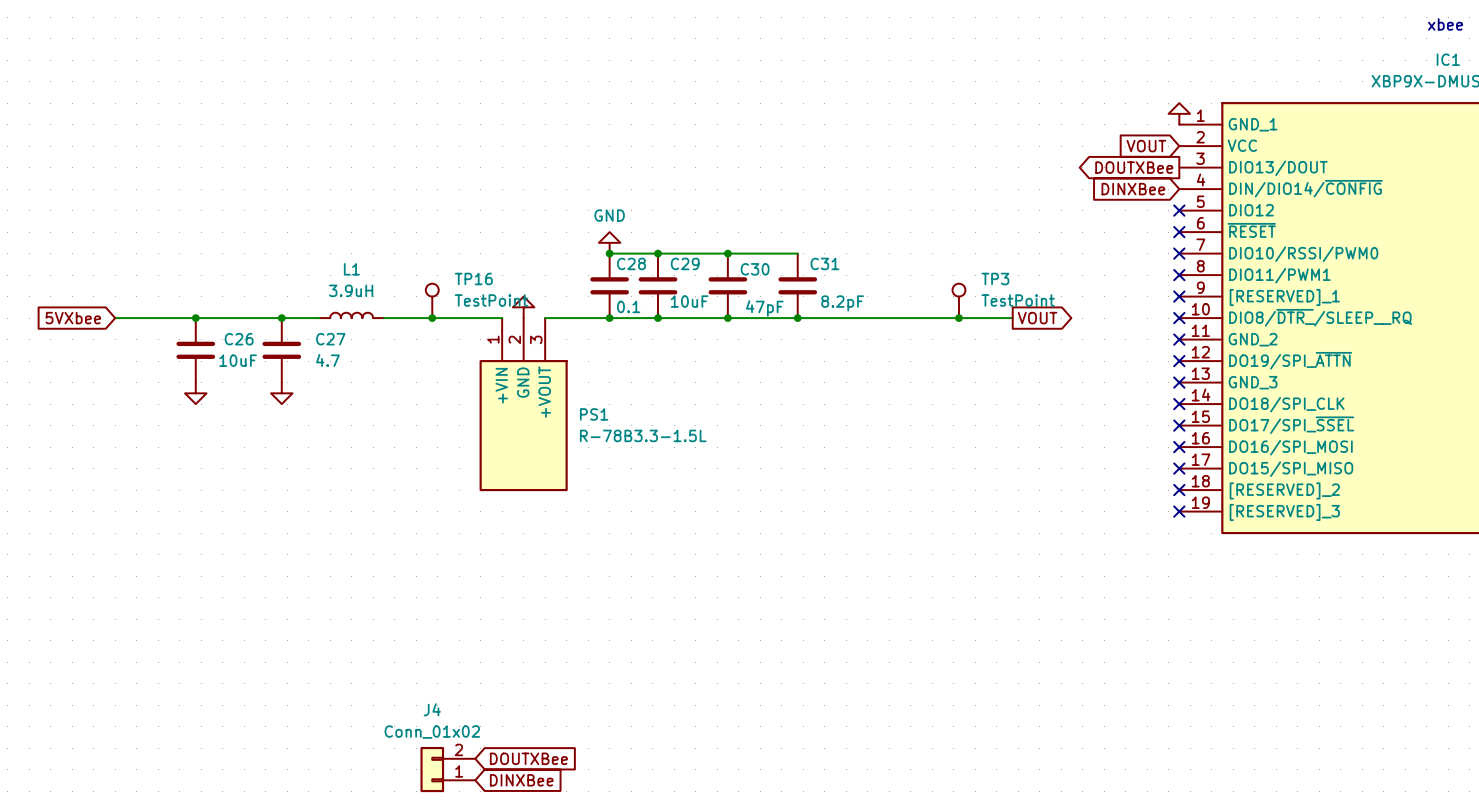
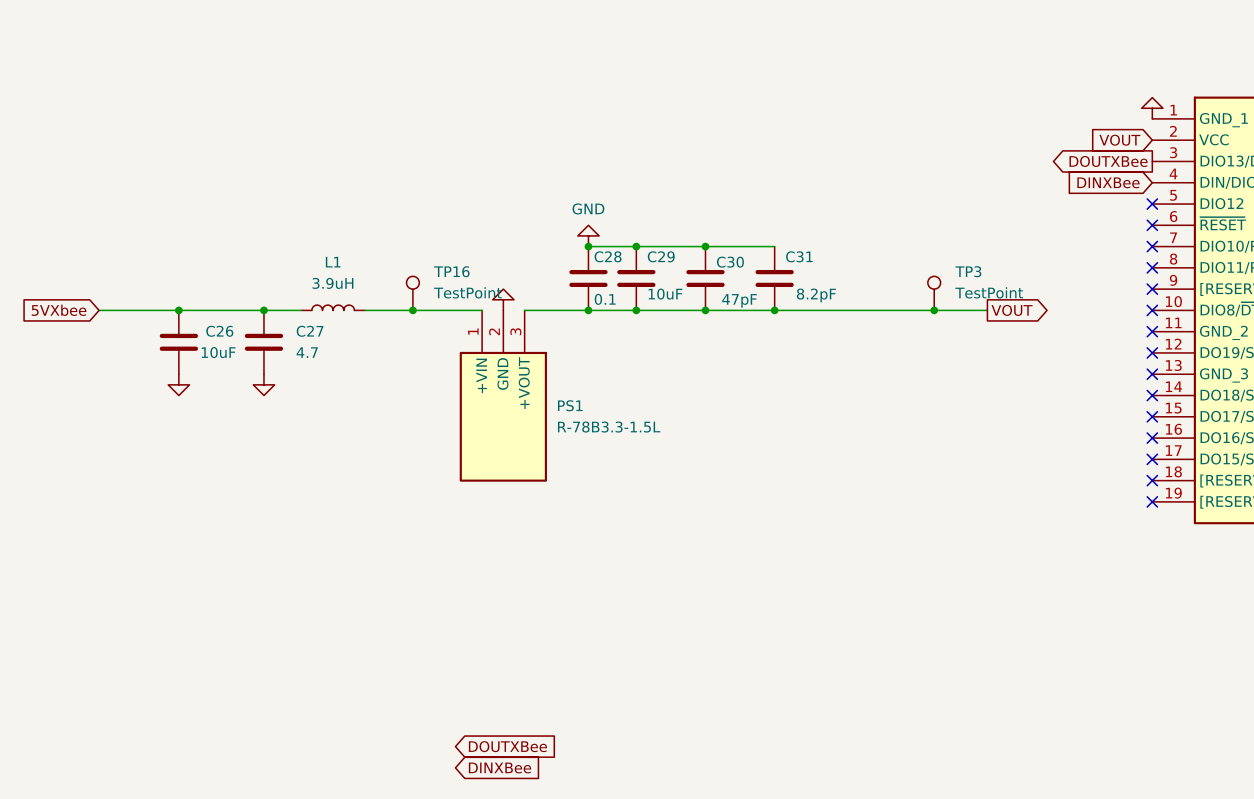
J4: Conn_01x02 (447, 769) -> none

